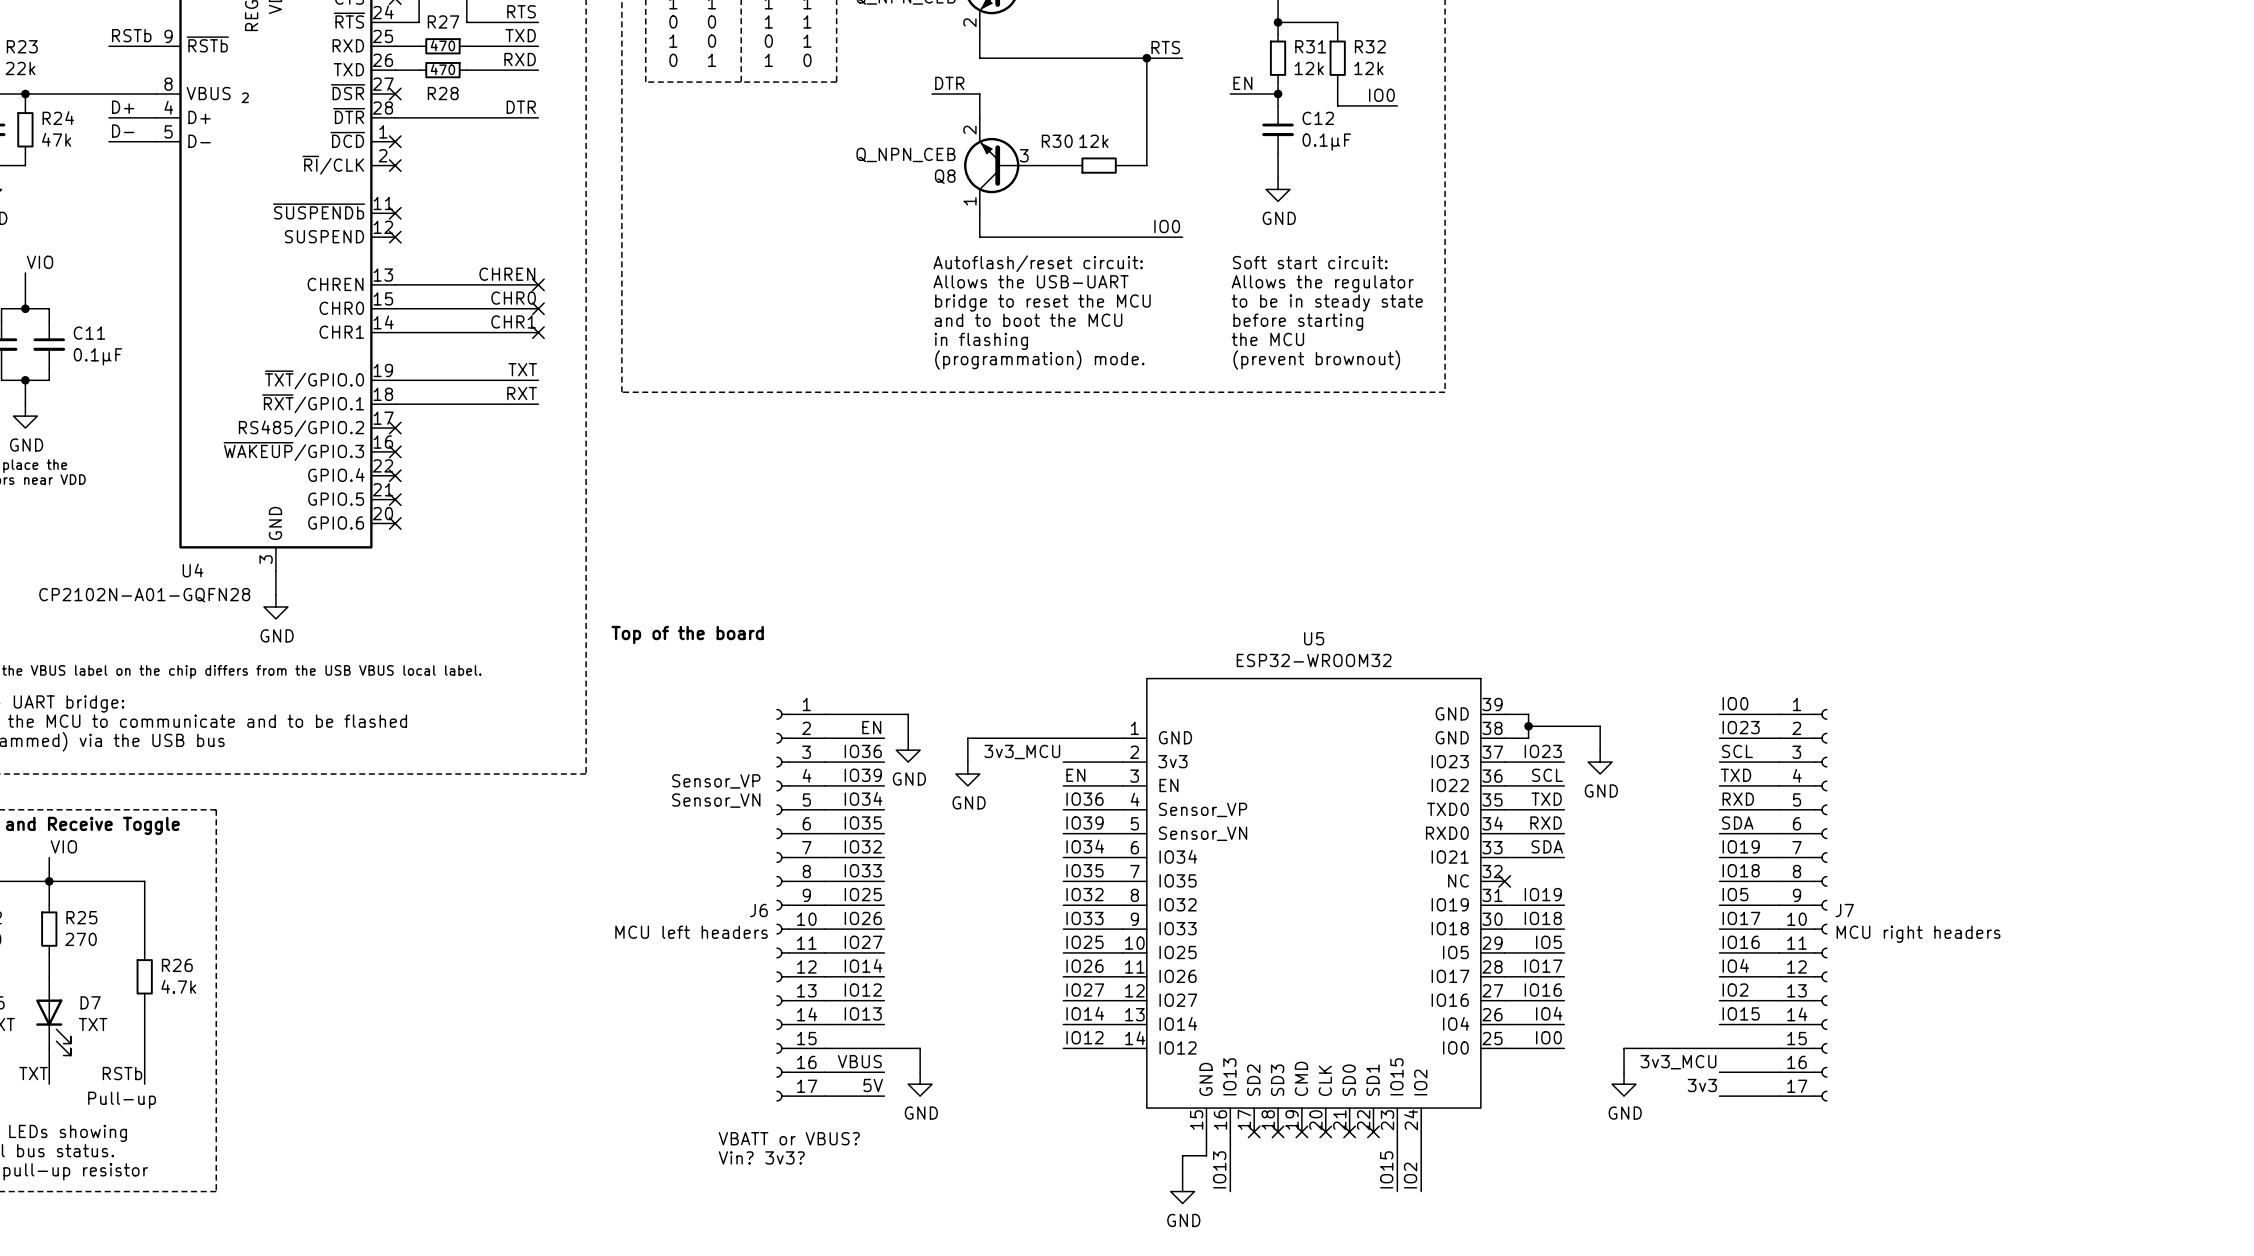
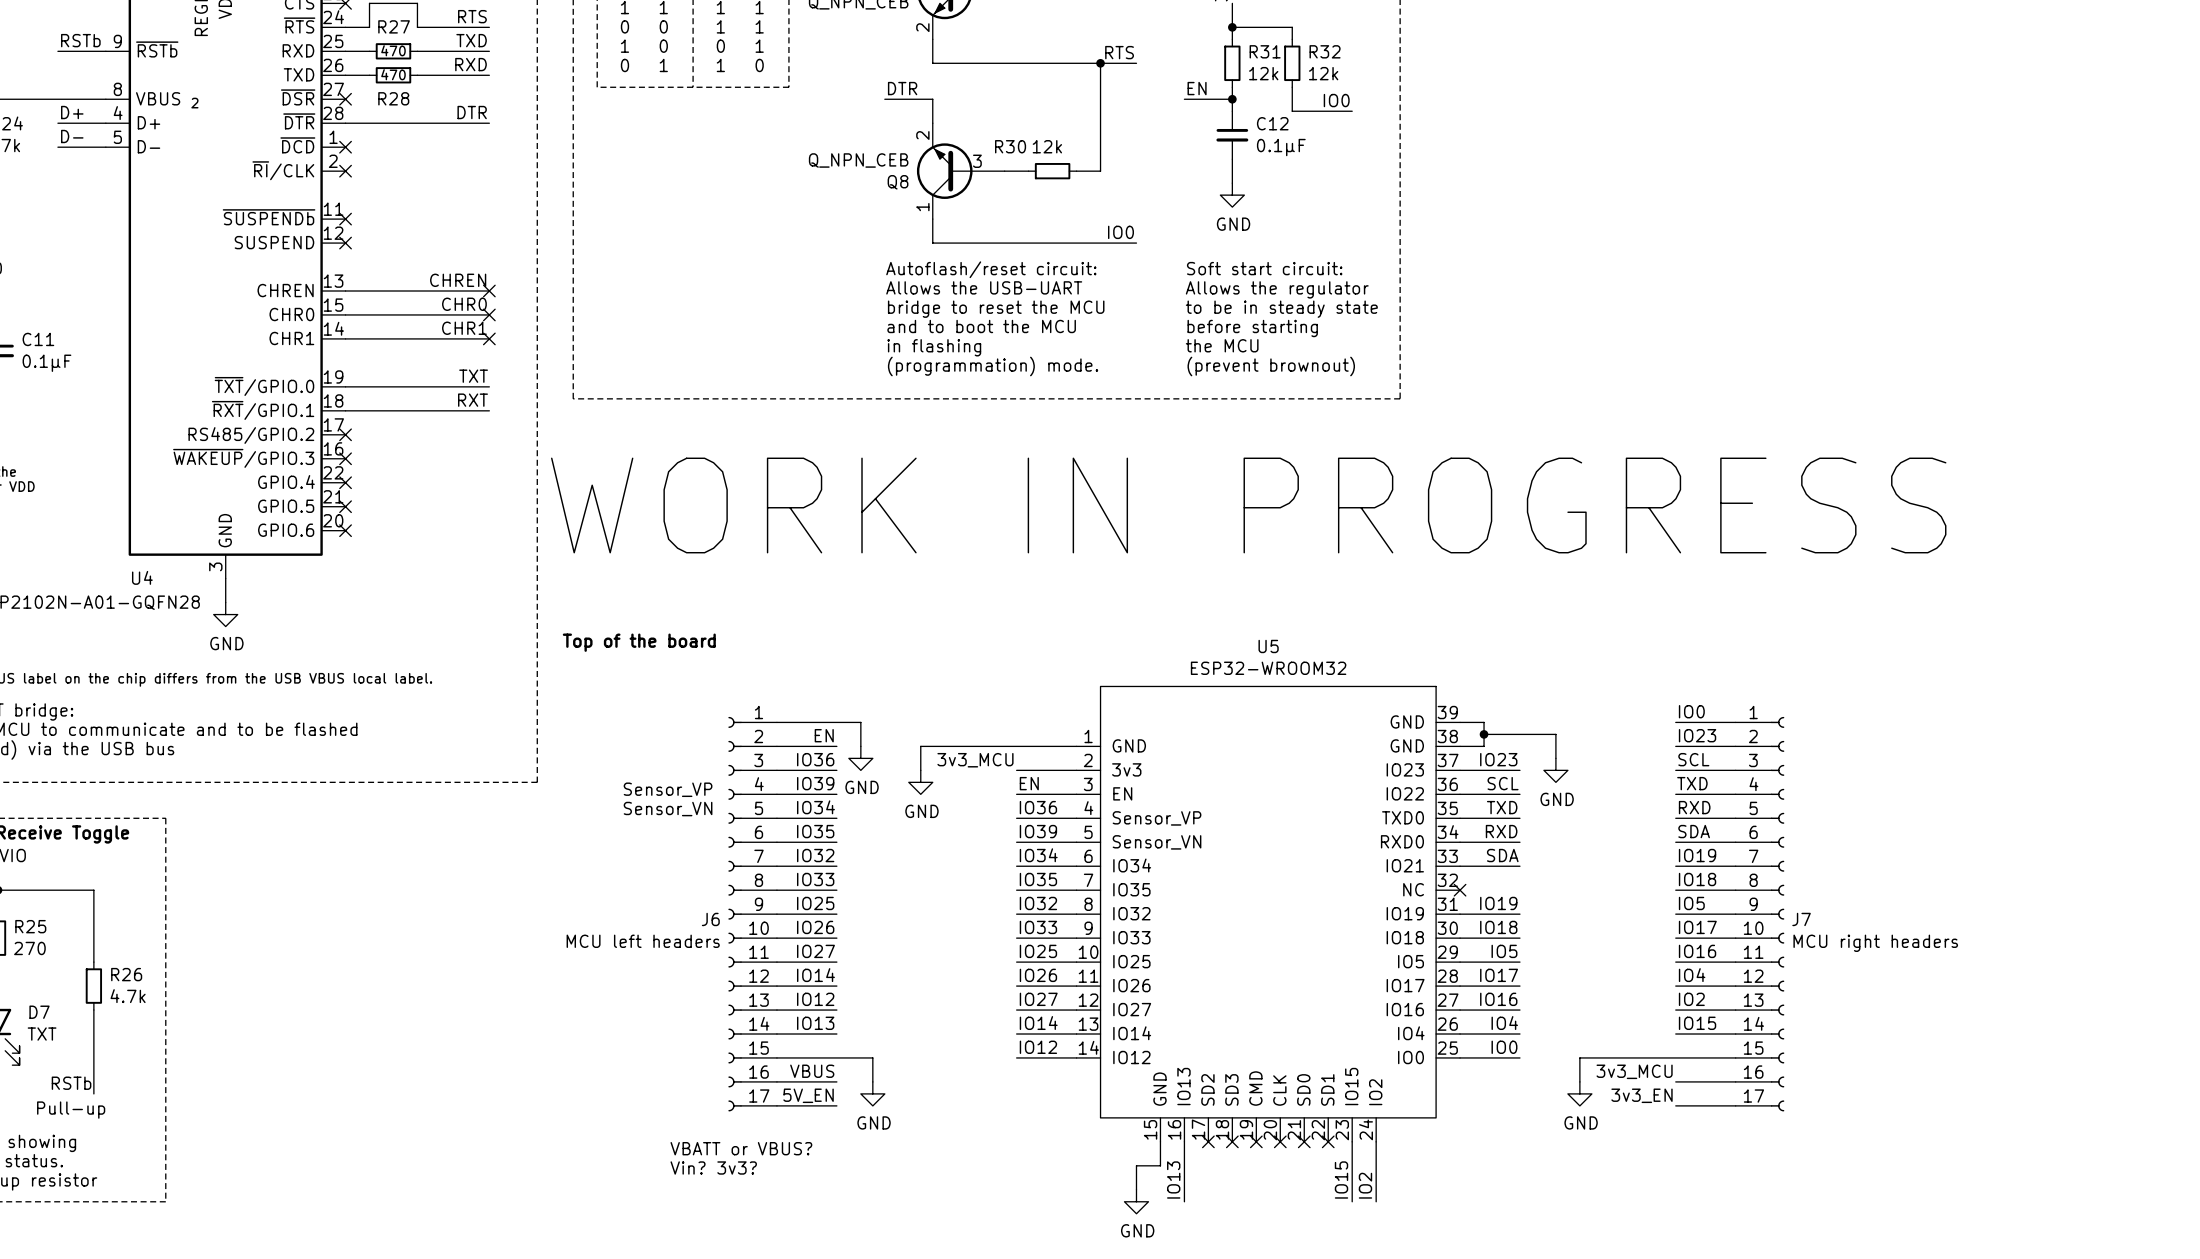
text: none -> WORK IN PROGRESS (1248, 505)
label: 5V (873, 1085) -> 5V_EN (808, 1095)
label: 3v3 (1702, 1085) -> 3v3_EN (1642, 1095)

